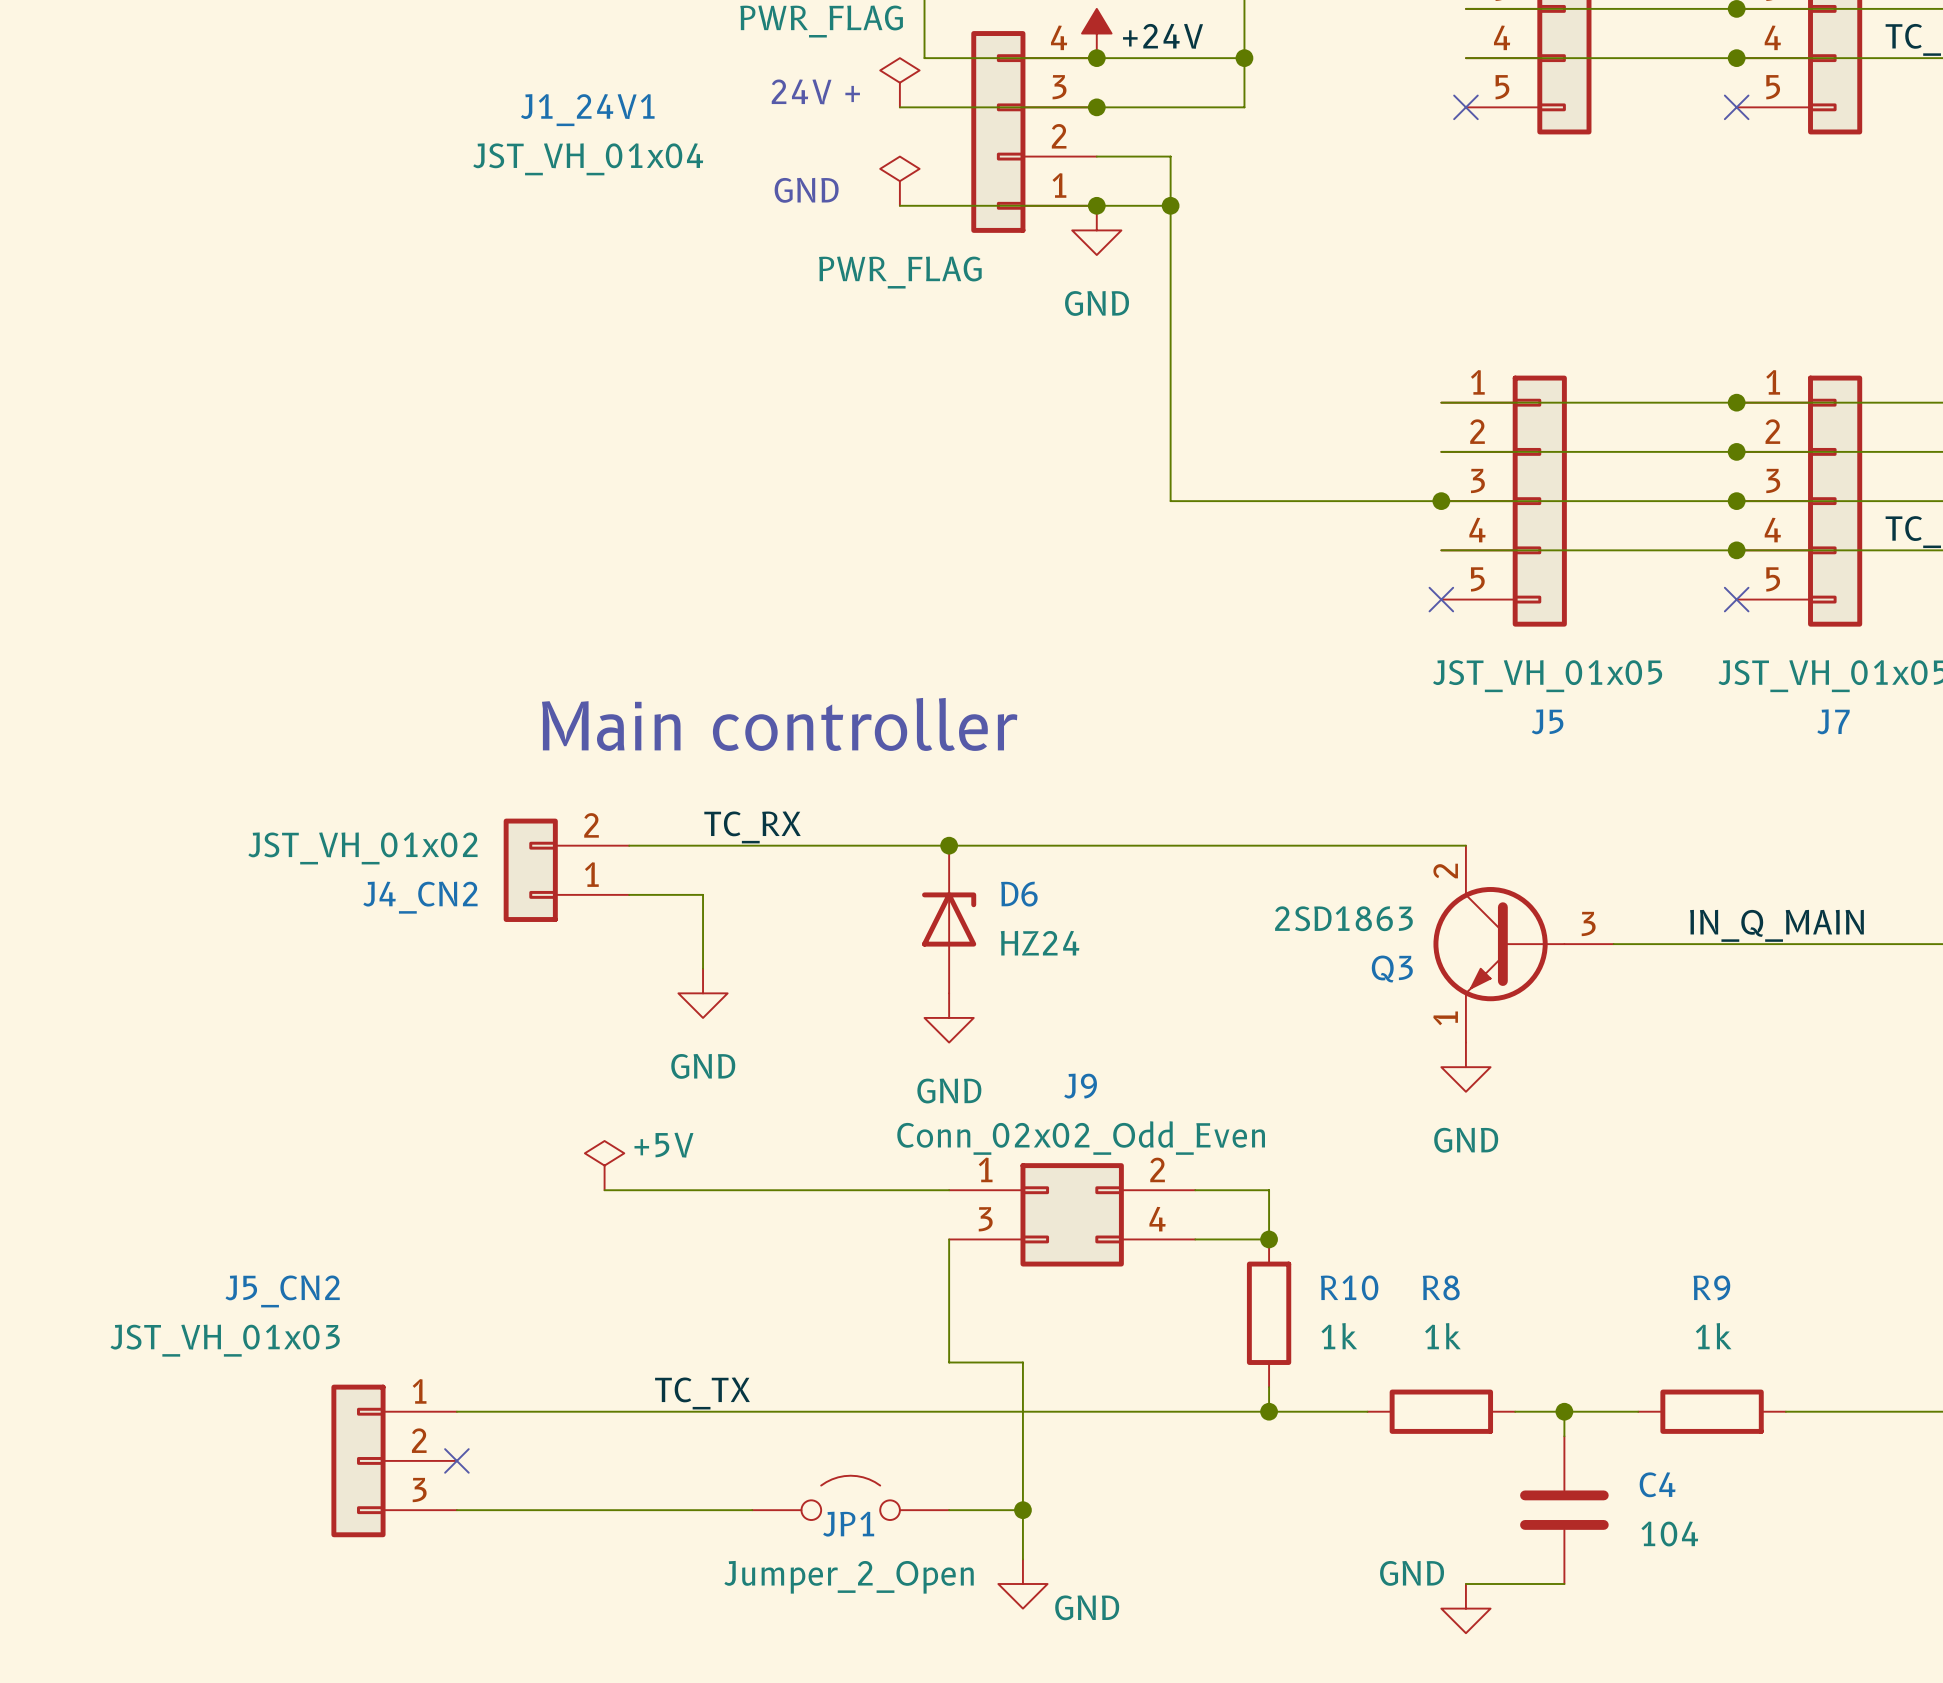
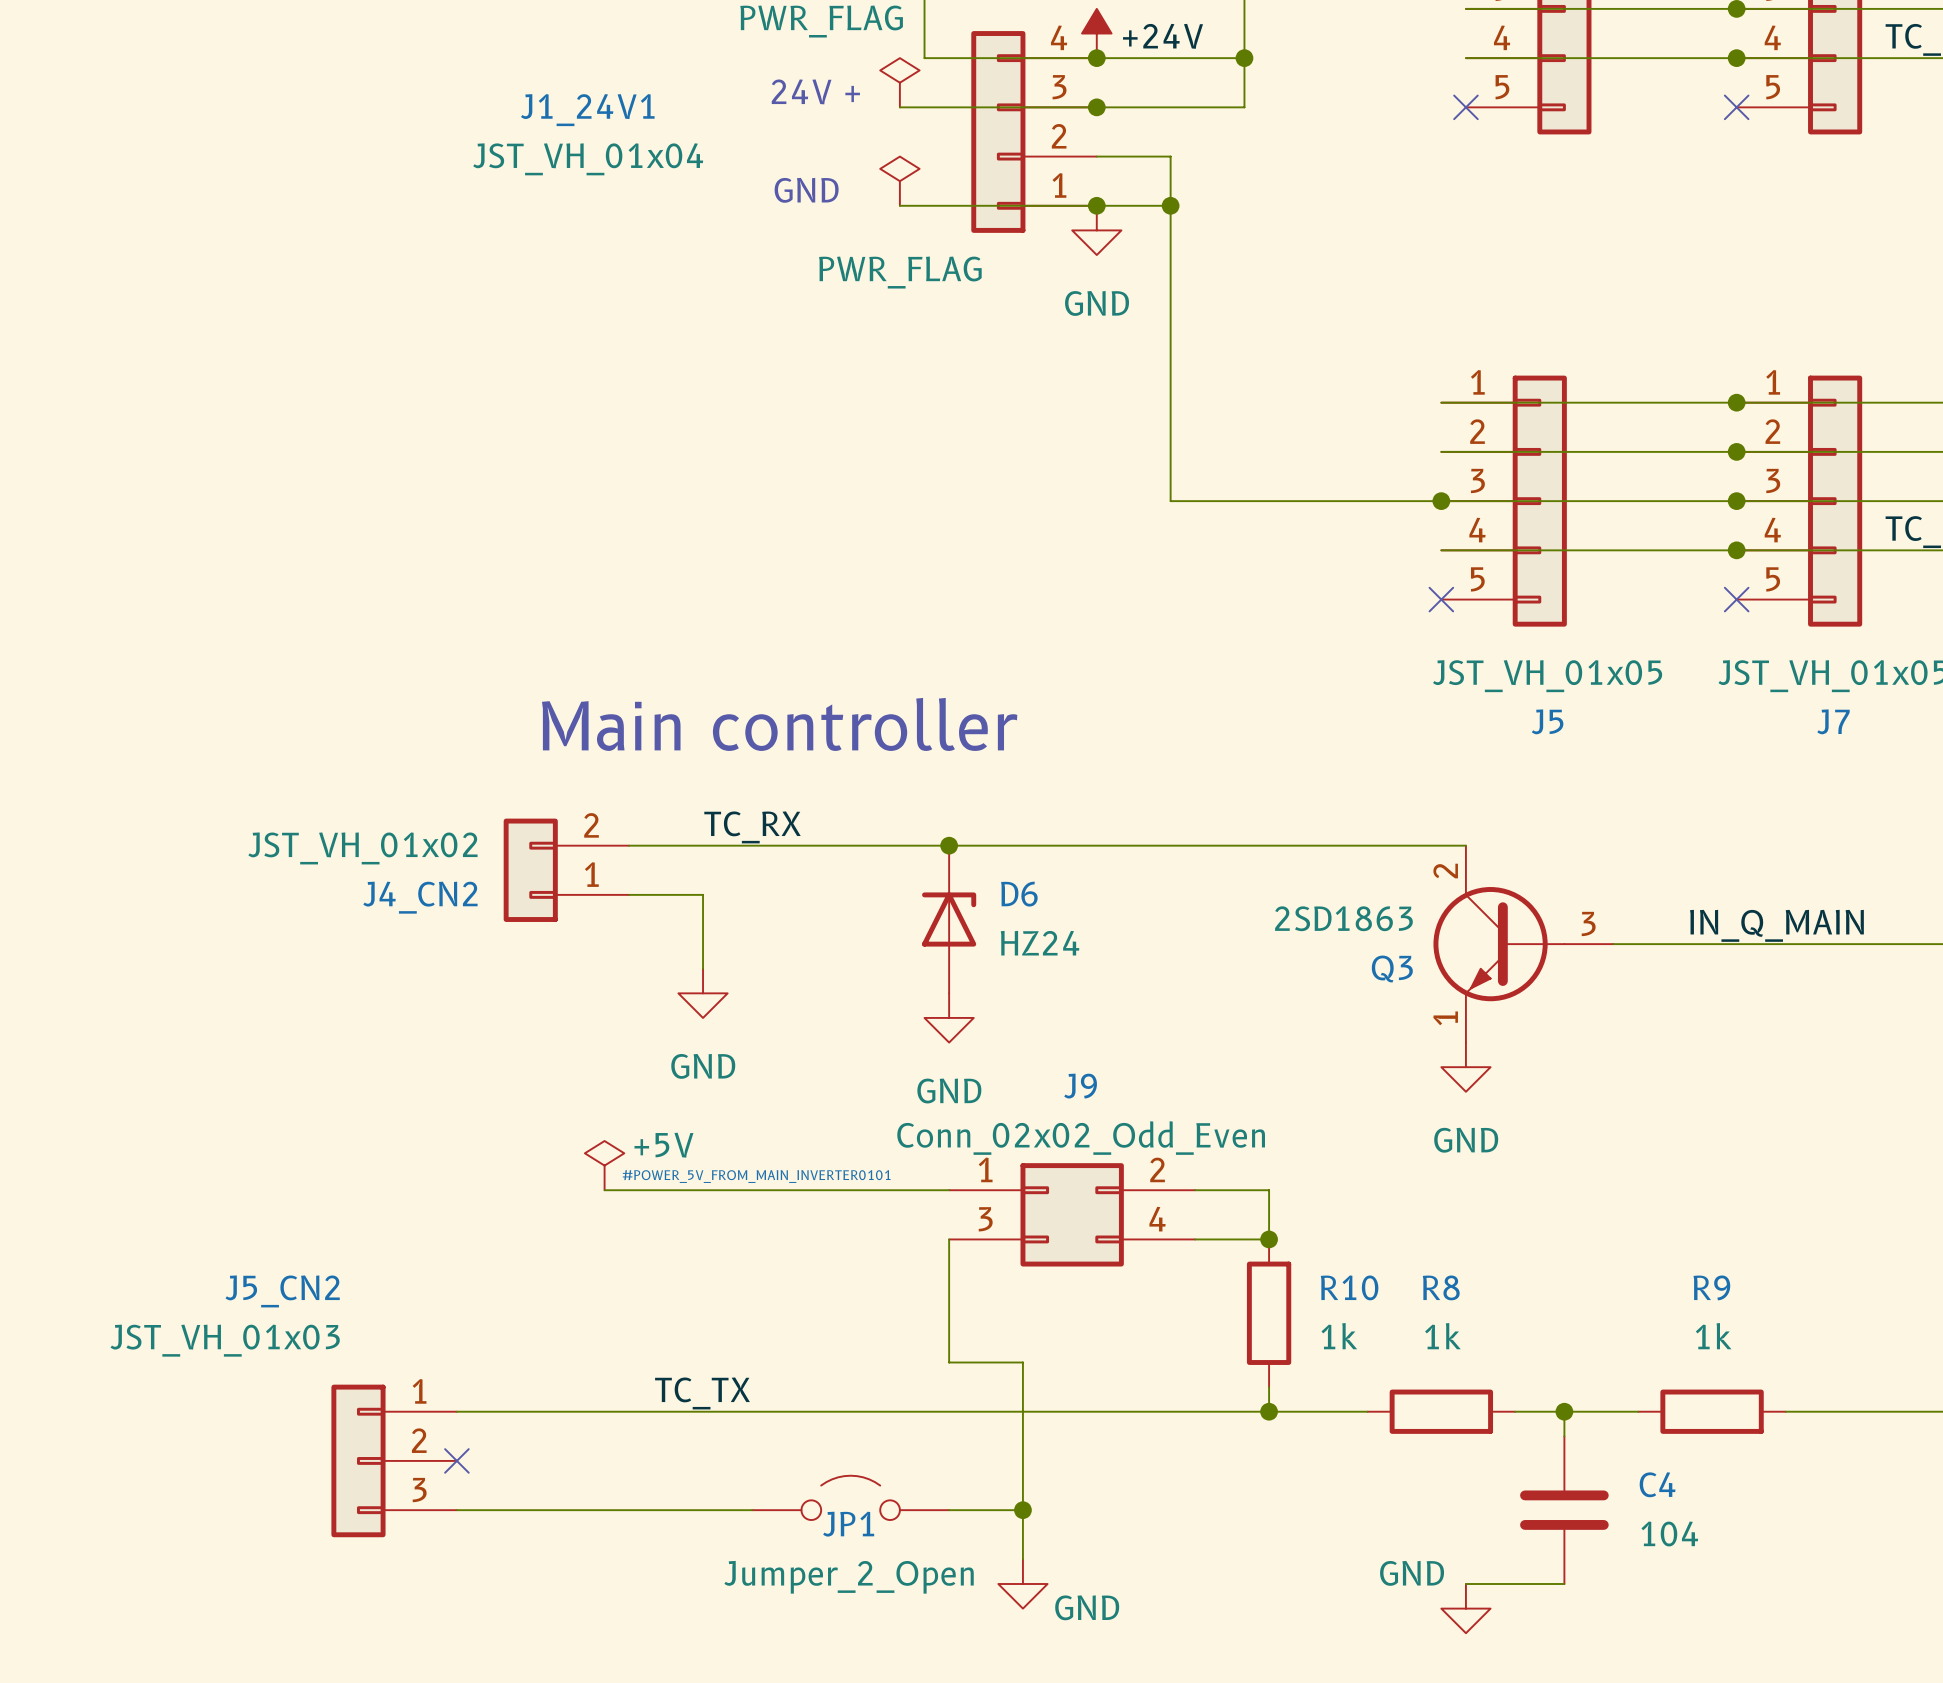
#POWER_5V_FROM_MAIN_INVERTER0101 name: none -> #POWER_5V_FROM_MAIN_INVERTER0101 (756, 1176)

